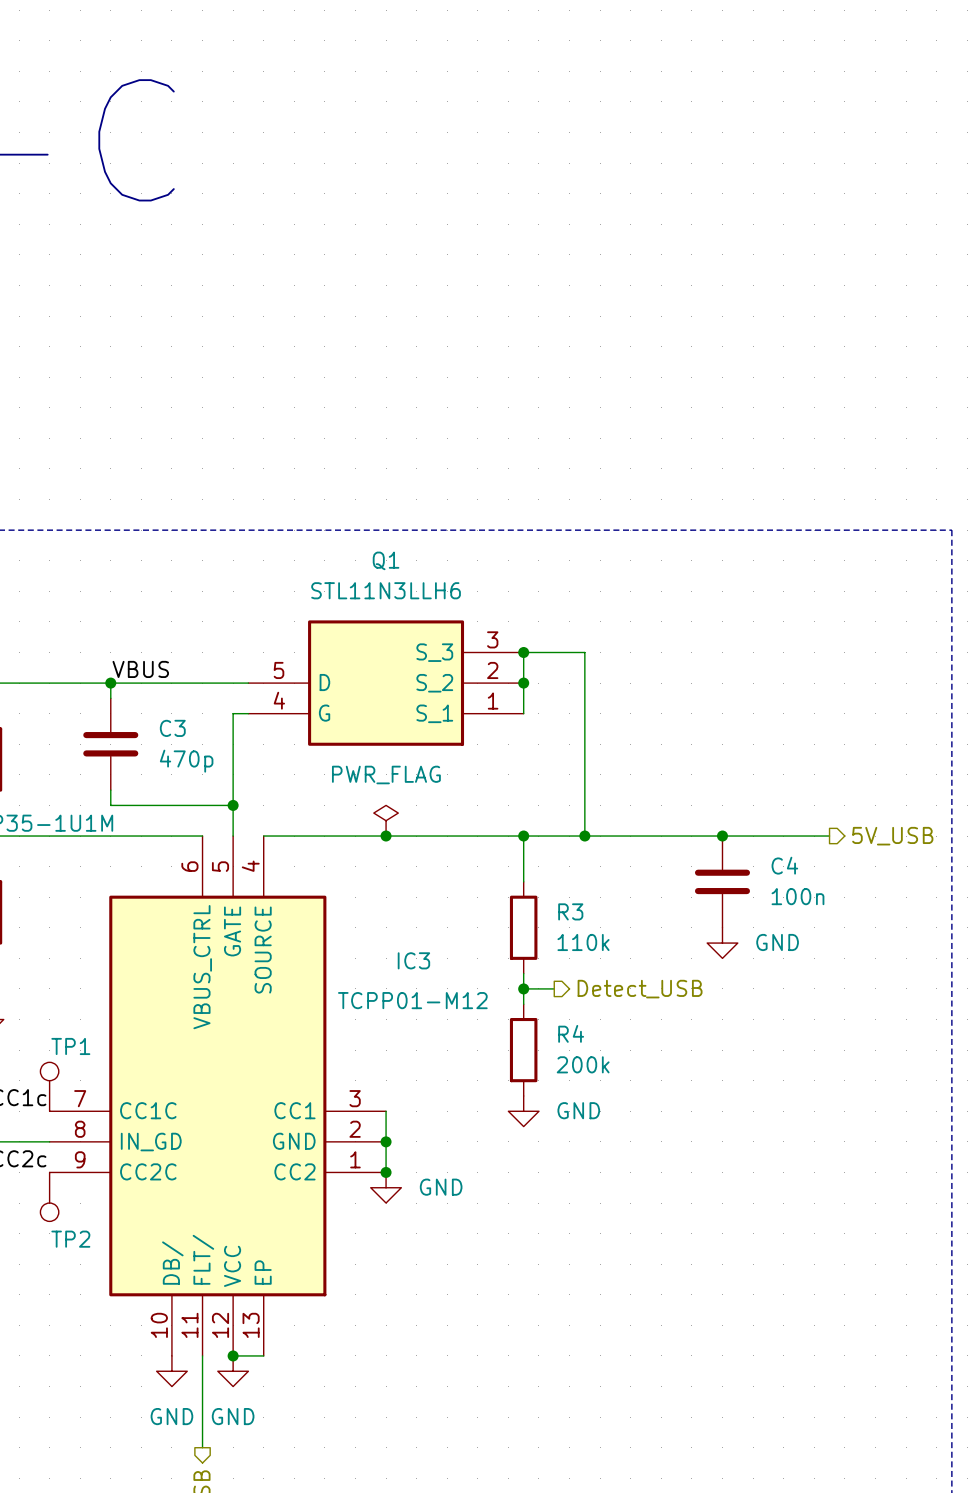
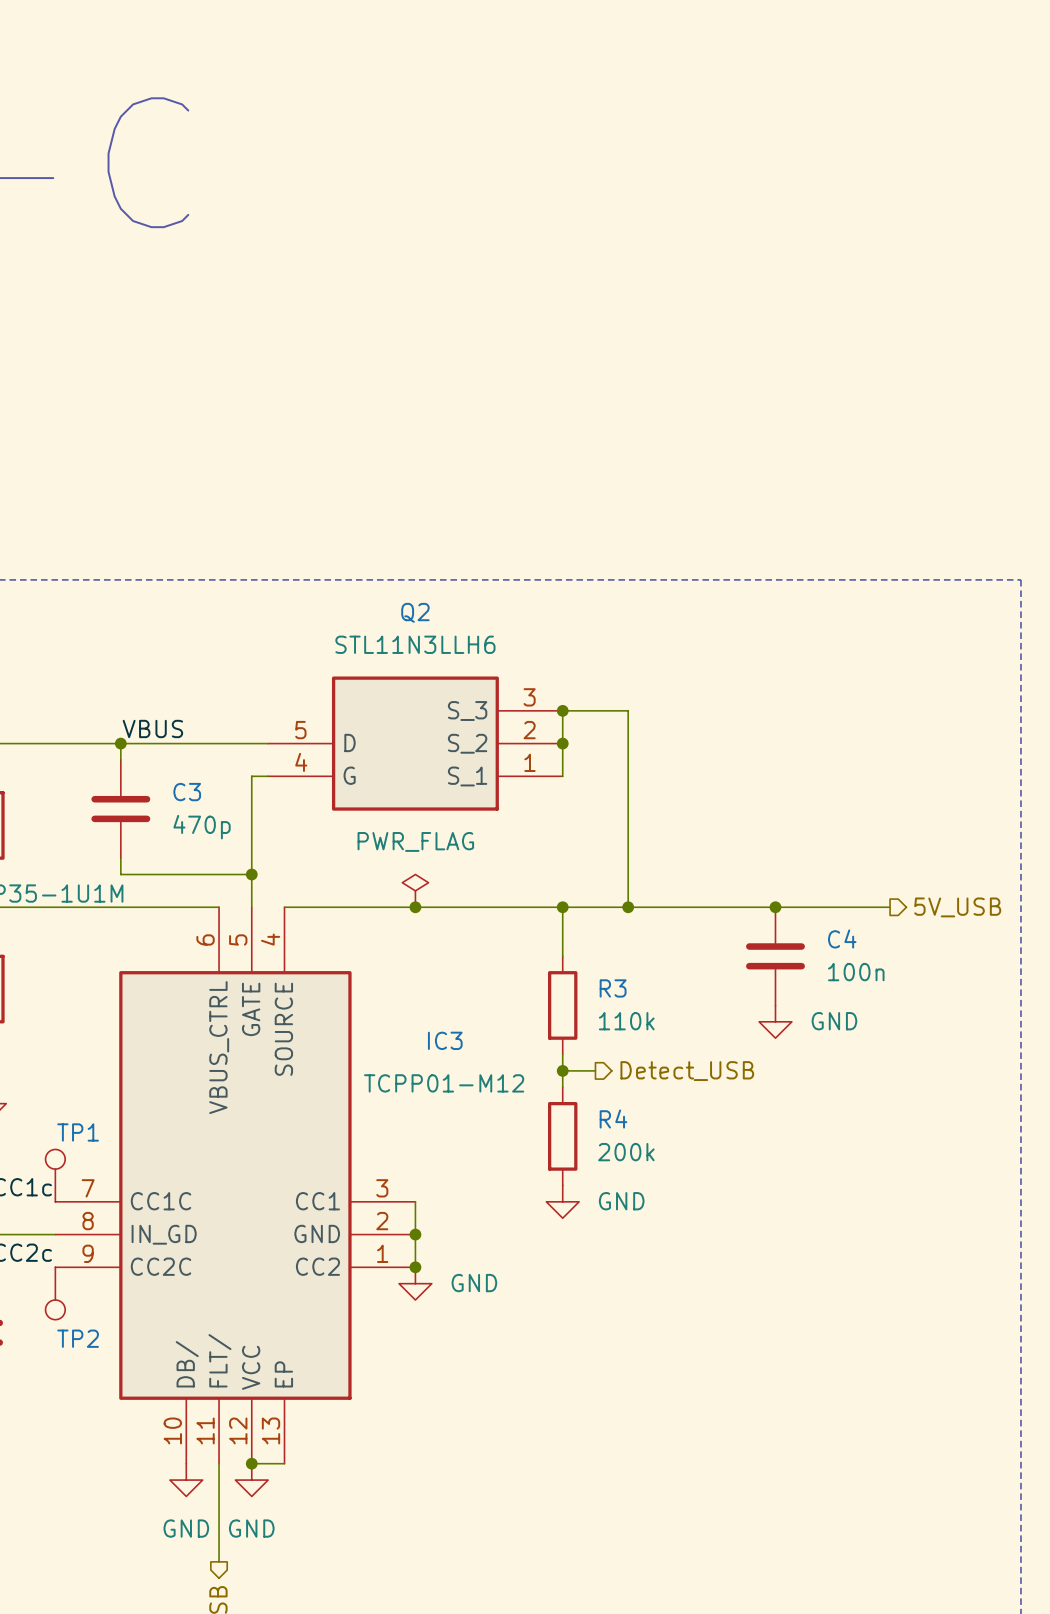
Q1 name: Q1 (386, 560) -> Q2 (415, 612)

